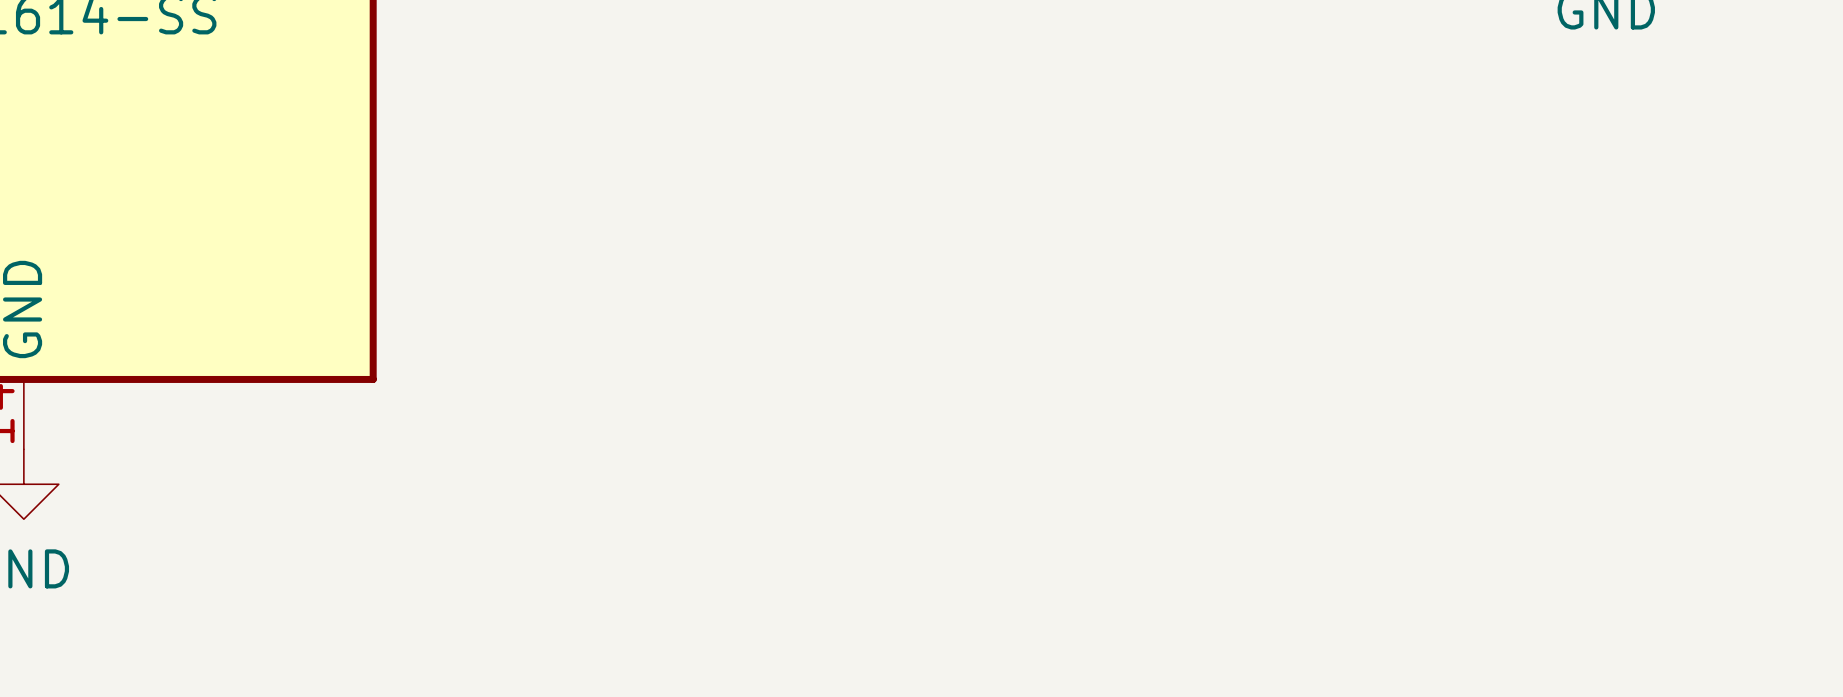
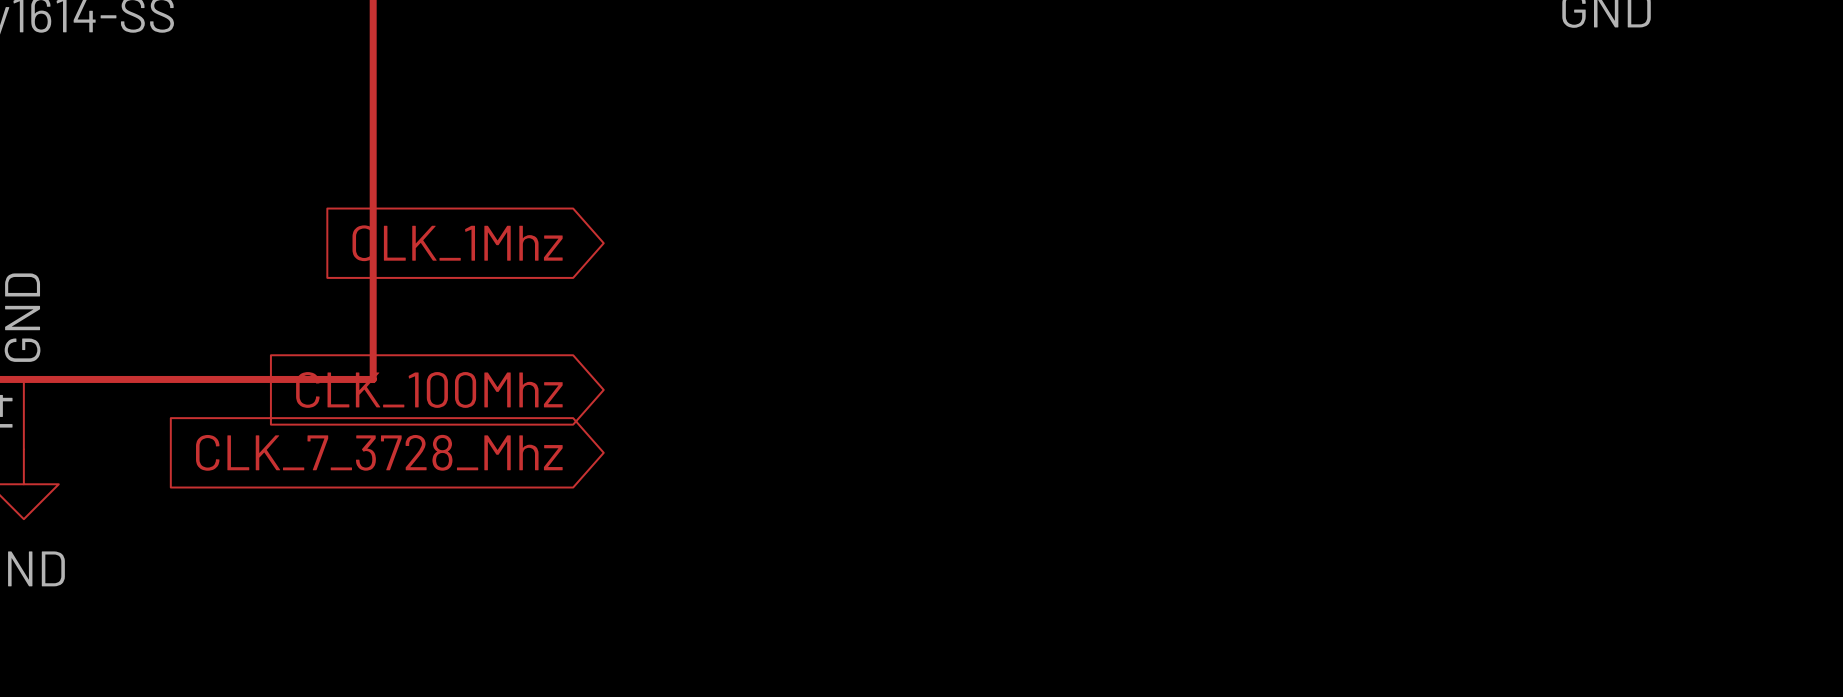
global label: none -> CLK_1Mhz (457, 243)
global label: none -> CLK_100Mhz (429, 389)
global label: none -> CLK_7_3728_Mhz (379, 452)

